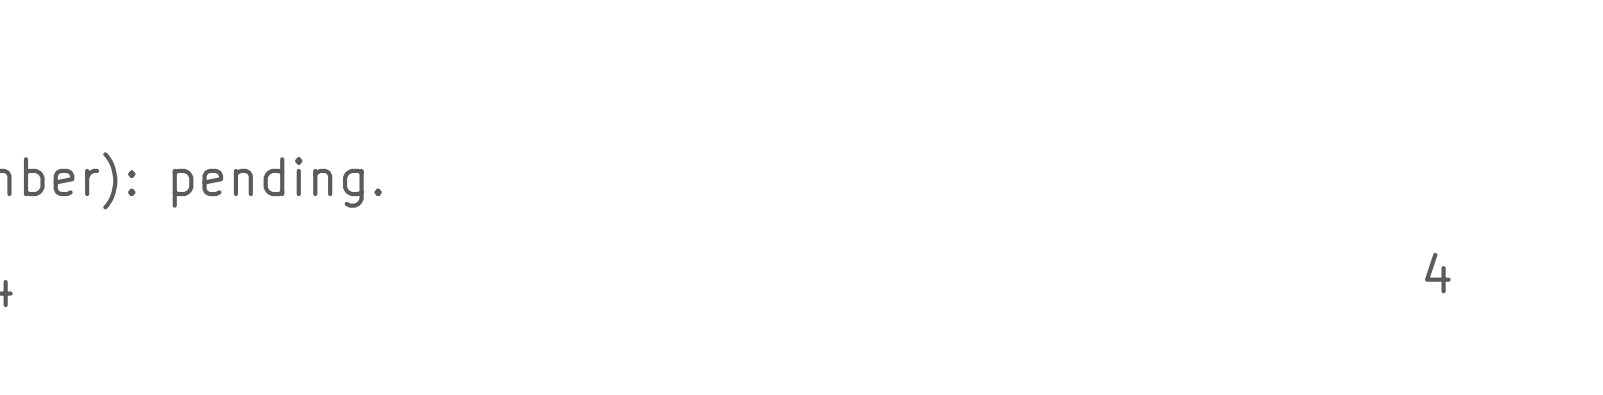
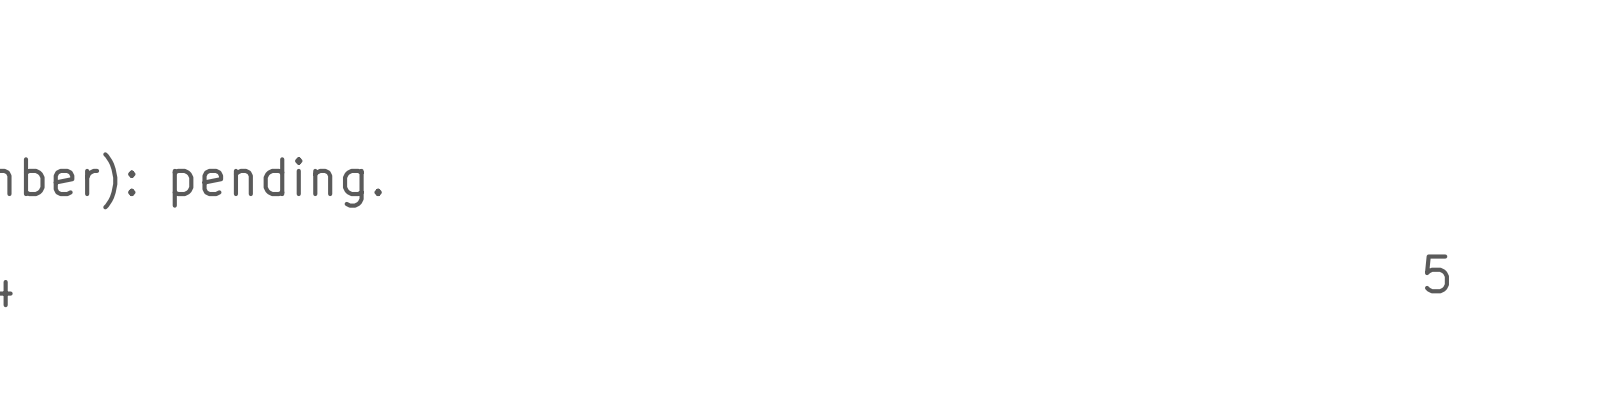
text: 4 (1437, 273) -> 5 (1436, 273)

